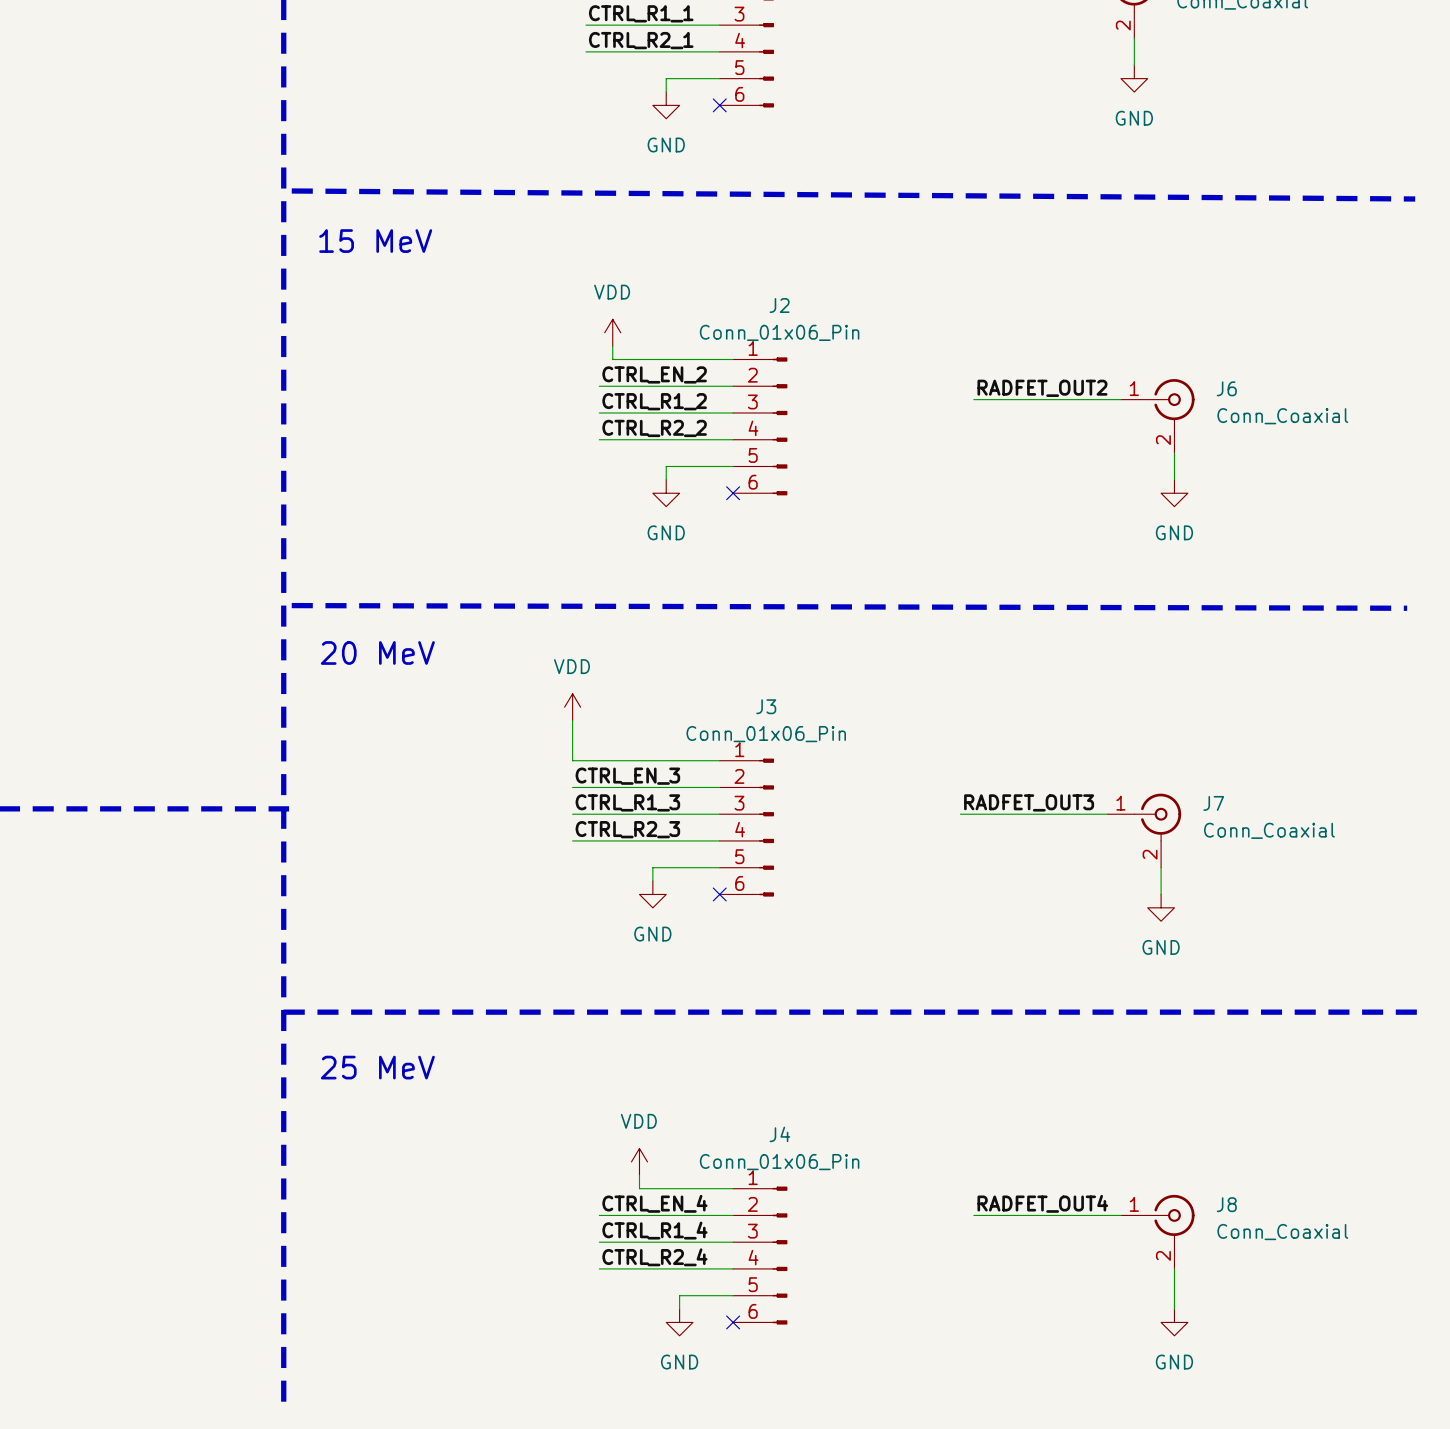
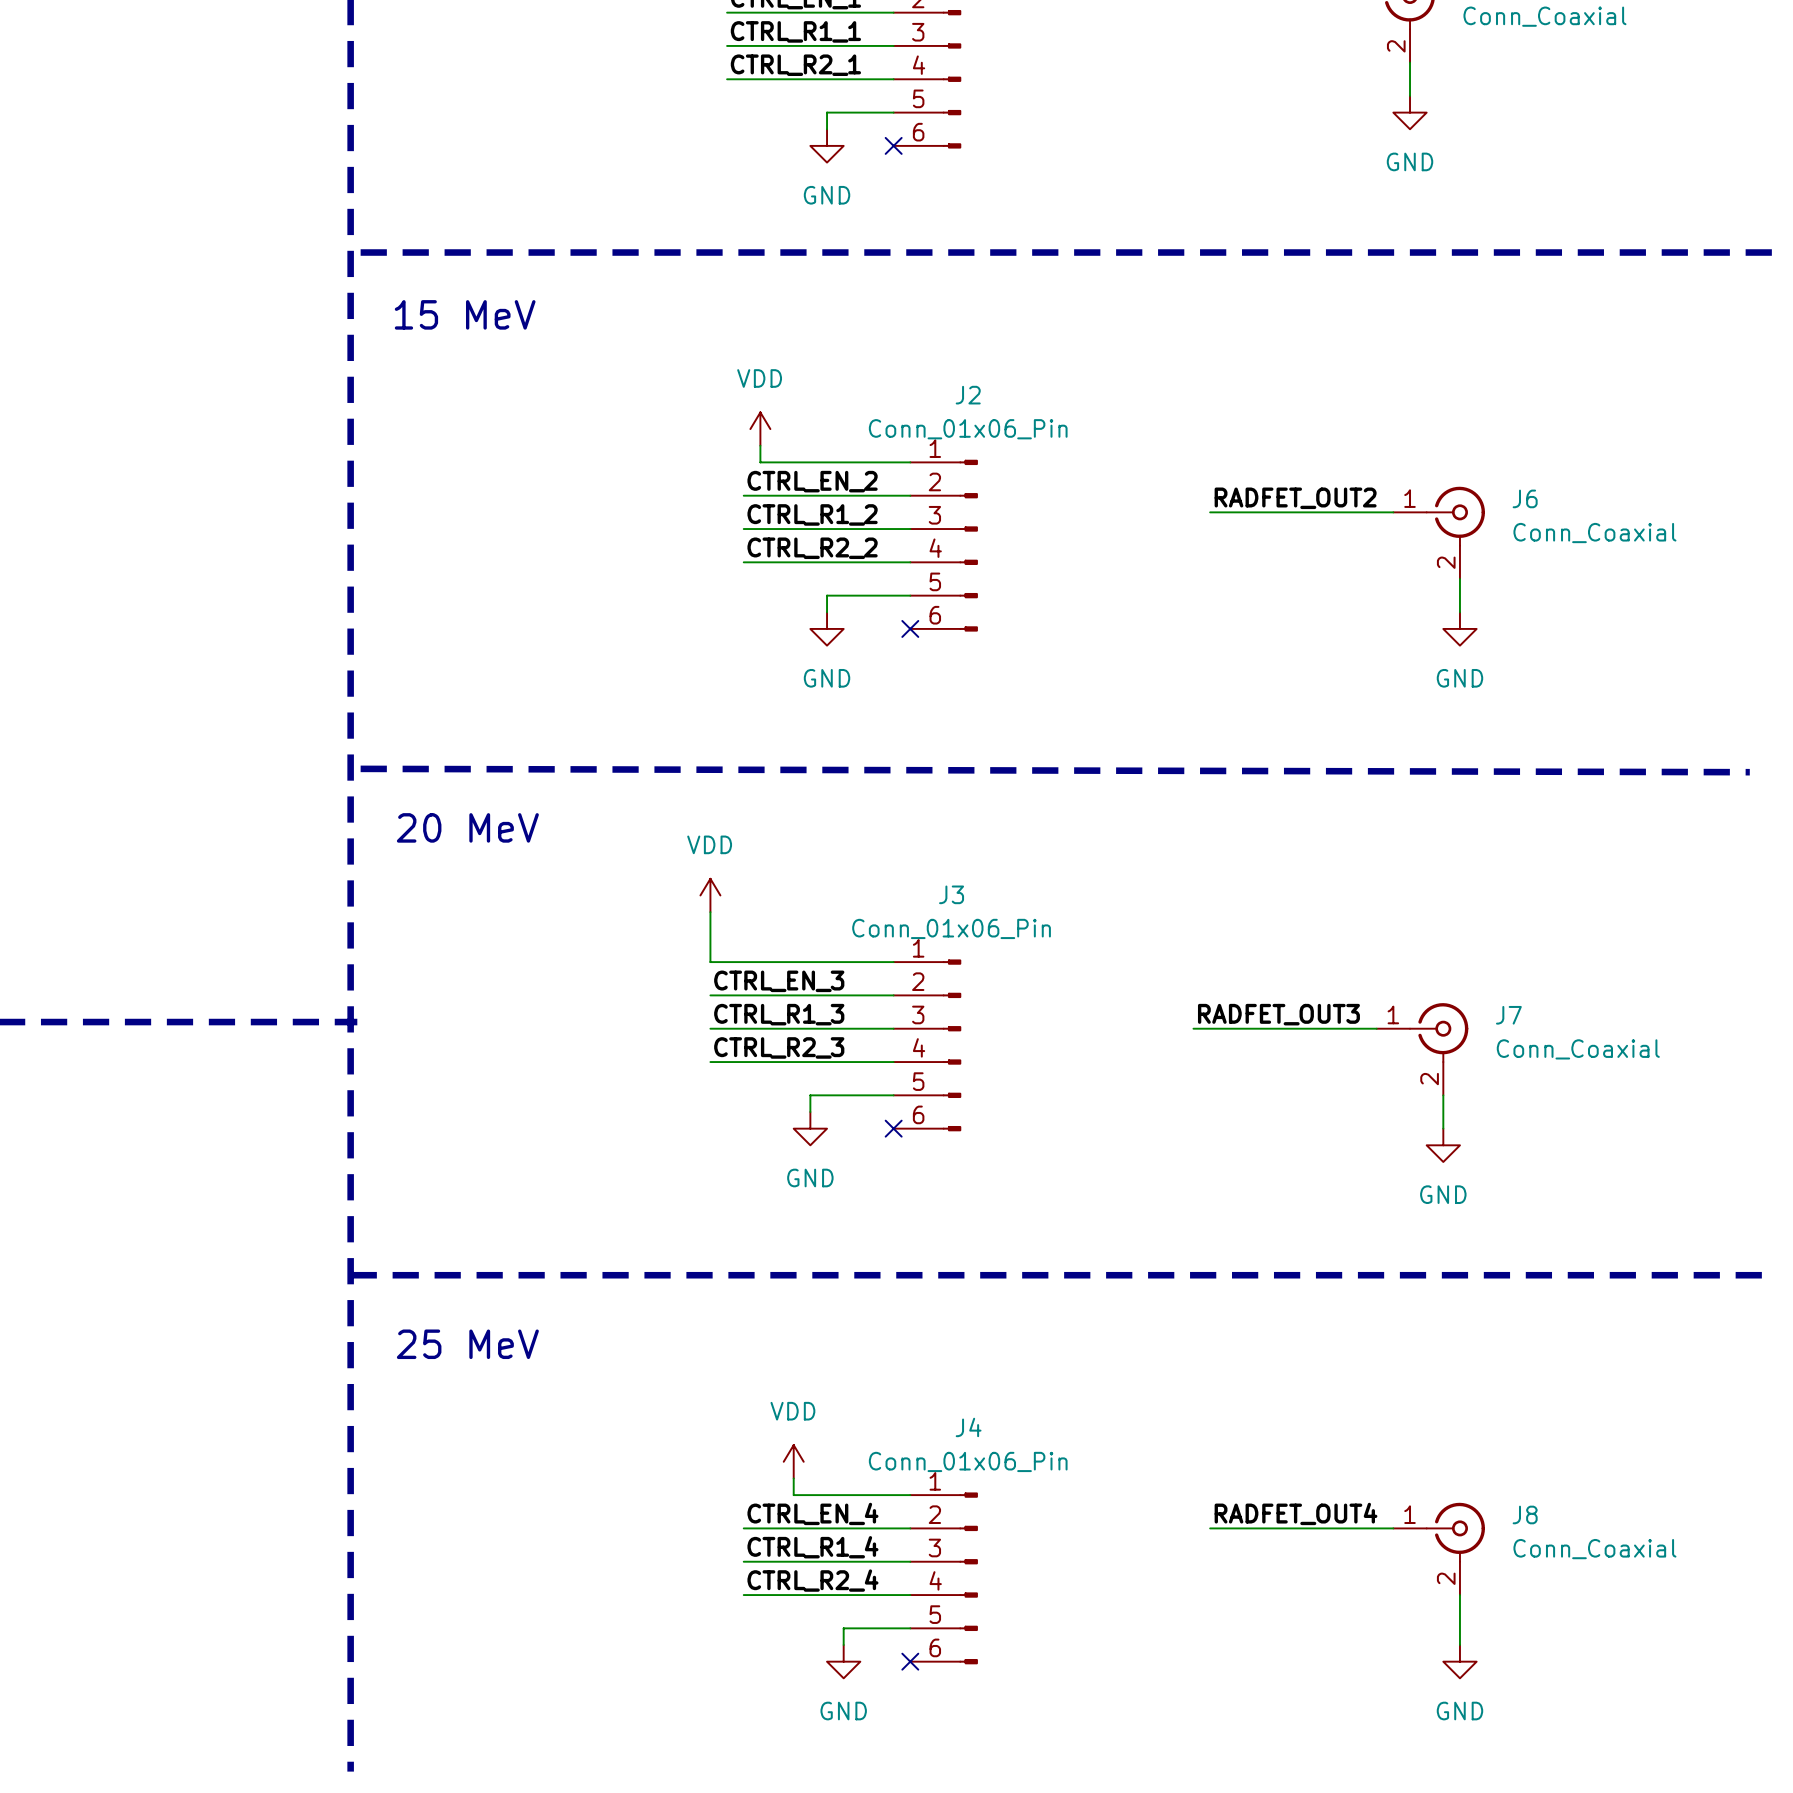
line: (291, 190) (1415, 199) -> (360, 252) (1776, 252)

